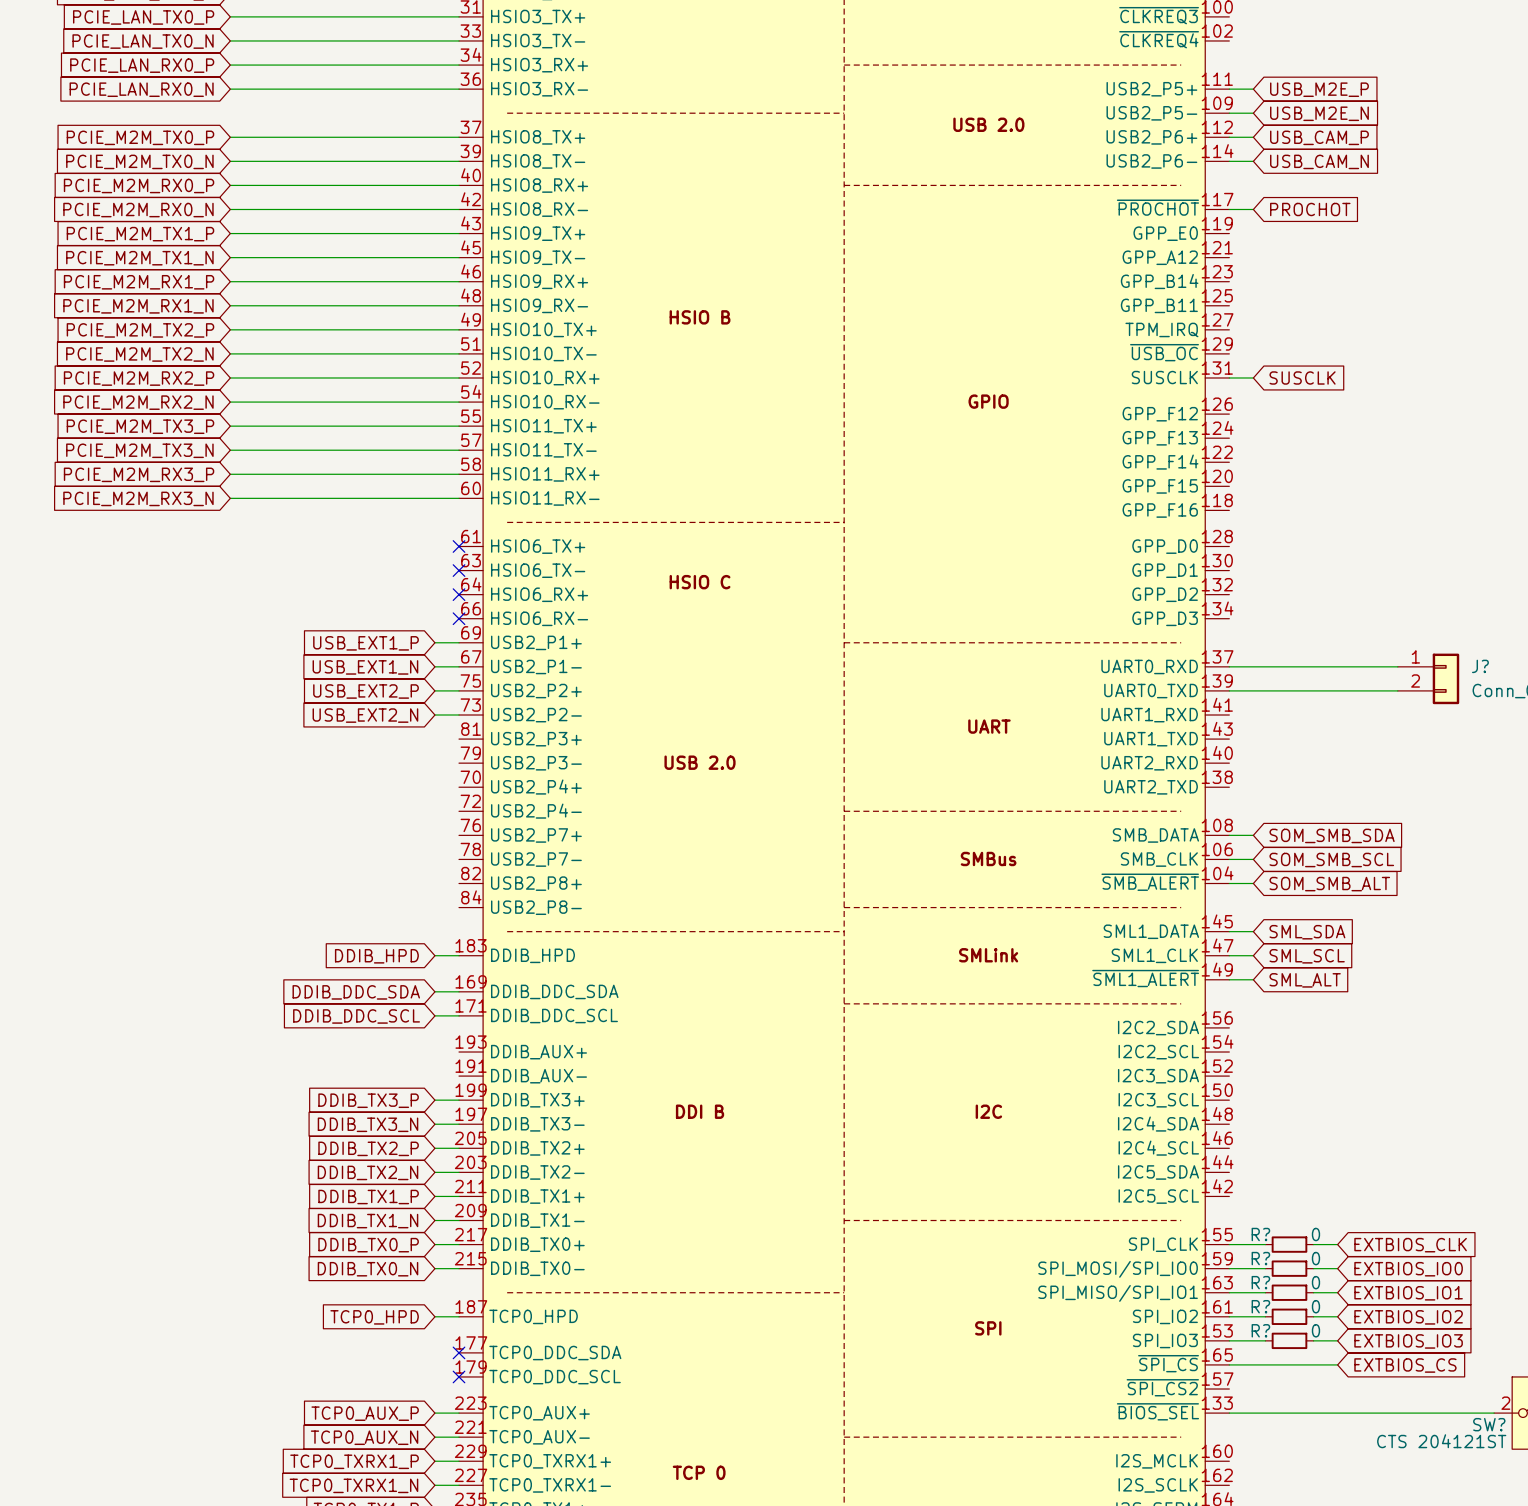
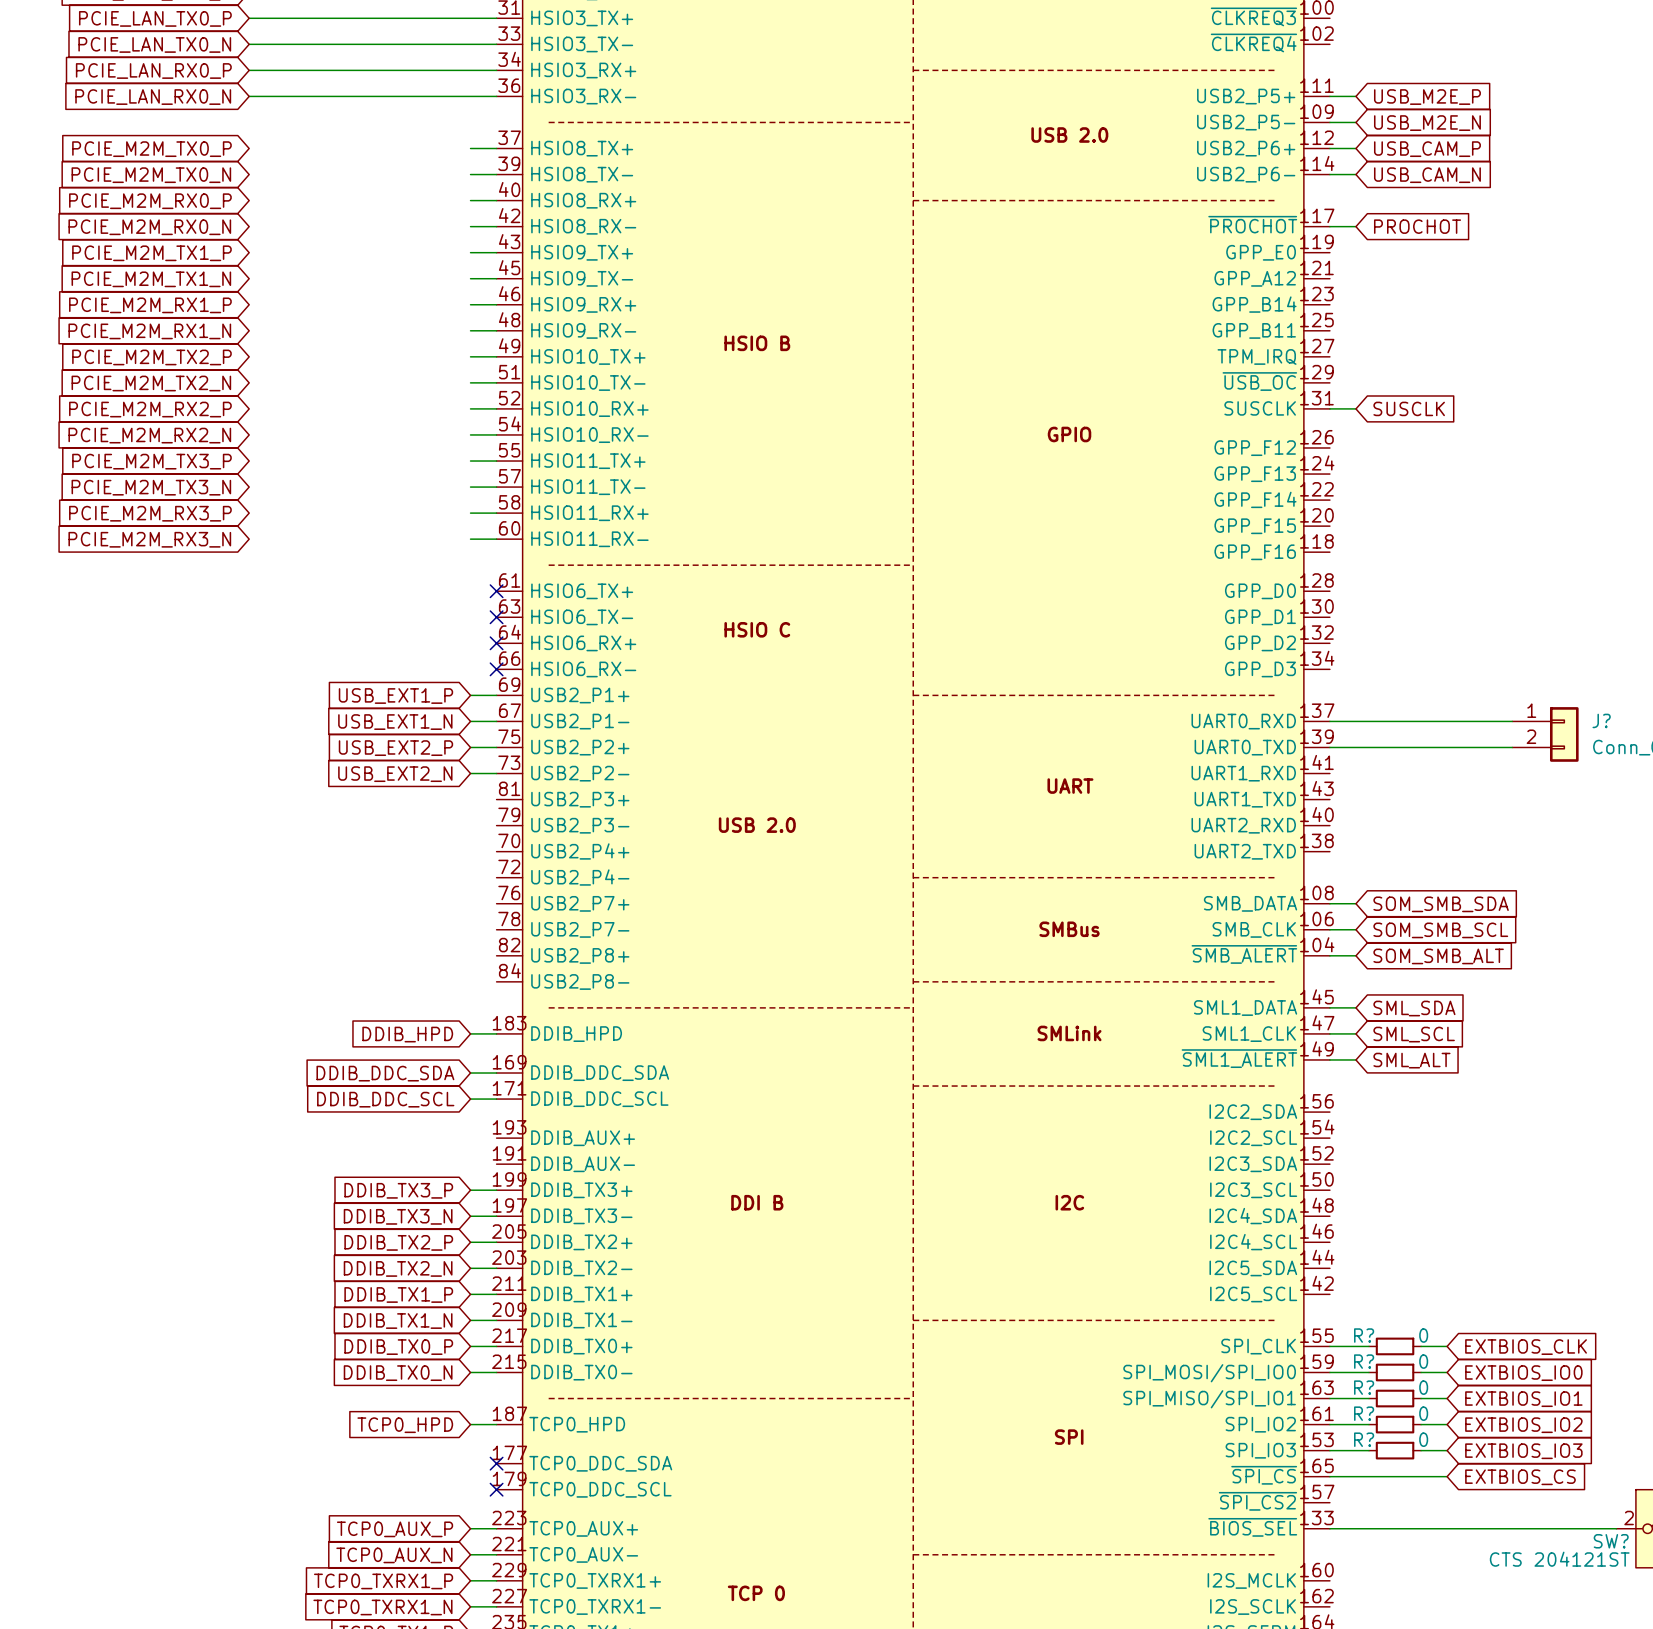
wire: (230, 137) (434, 137) -> none
wire: (230, 161) (434, 161) -> none
wire: (230, 185) (434, 185) -> none
wire: (230, 209) (434, 209) -> none
wire: (230, 233) (434, 233) -> none
wire: (230, 257) (434, 257) -> none
wire: (230, 281) (434, 281) -> none
wire: (230, 305) (434, 305) -> none
wire: (230, 329) (434, 329) -> none
wire: (230, 353) (434, 353) -> none
wire: (230, 377) (434, 377) -> none
wire: (230, 402) (434, 402) -> none
wire: (230, 426) (434, 426) -> none
wire: (230, 450) (434, 450) -> none
wire: (230, 474) (434, 474) -> none
wire: (230, 498) (434, 498) -> none

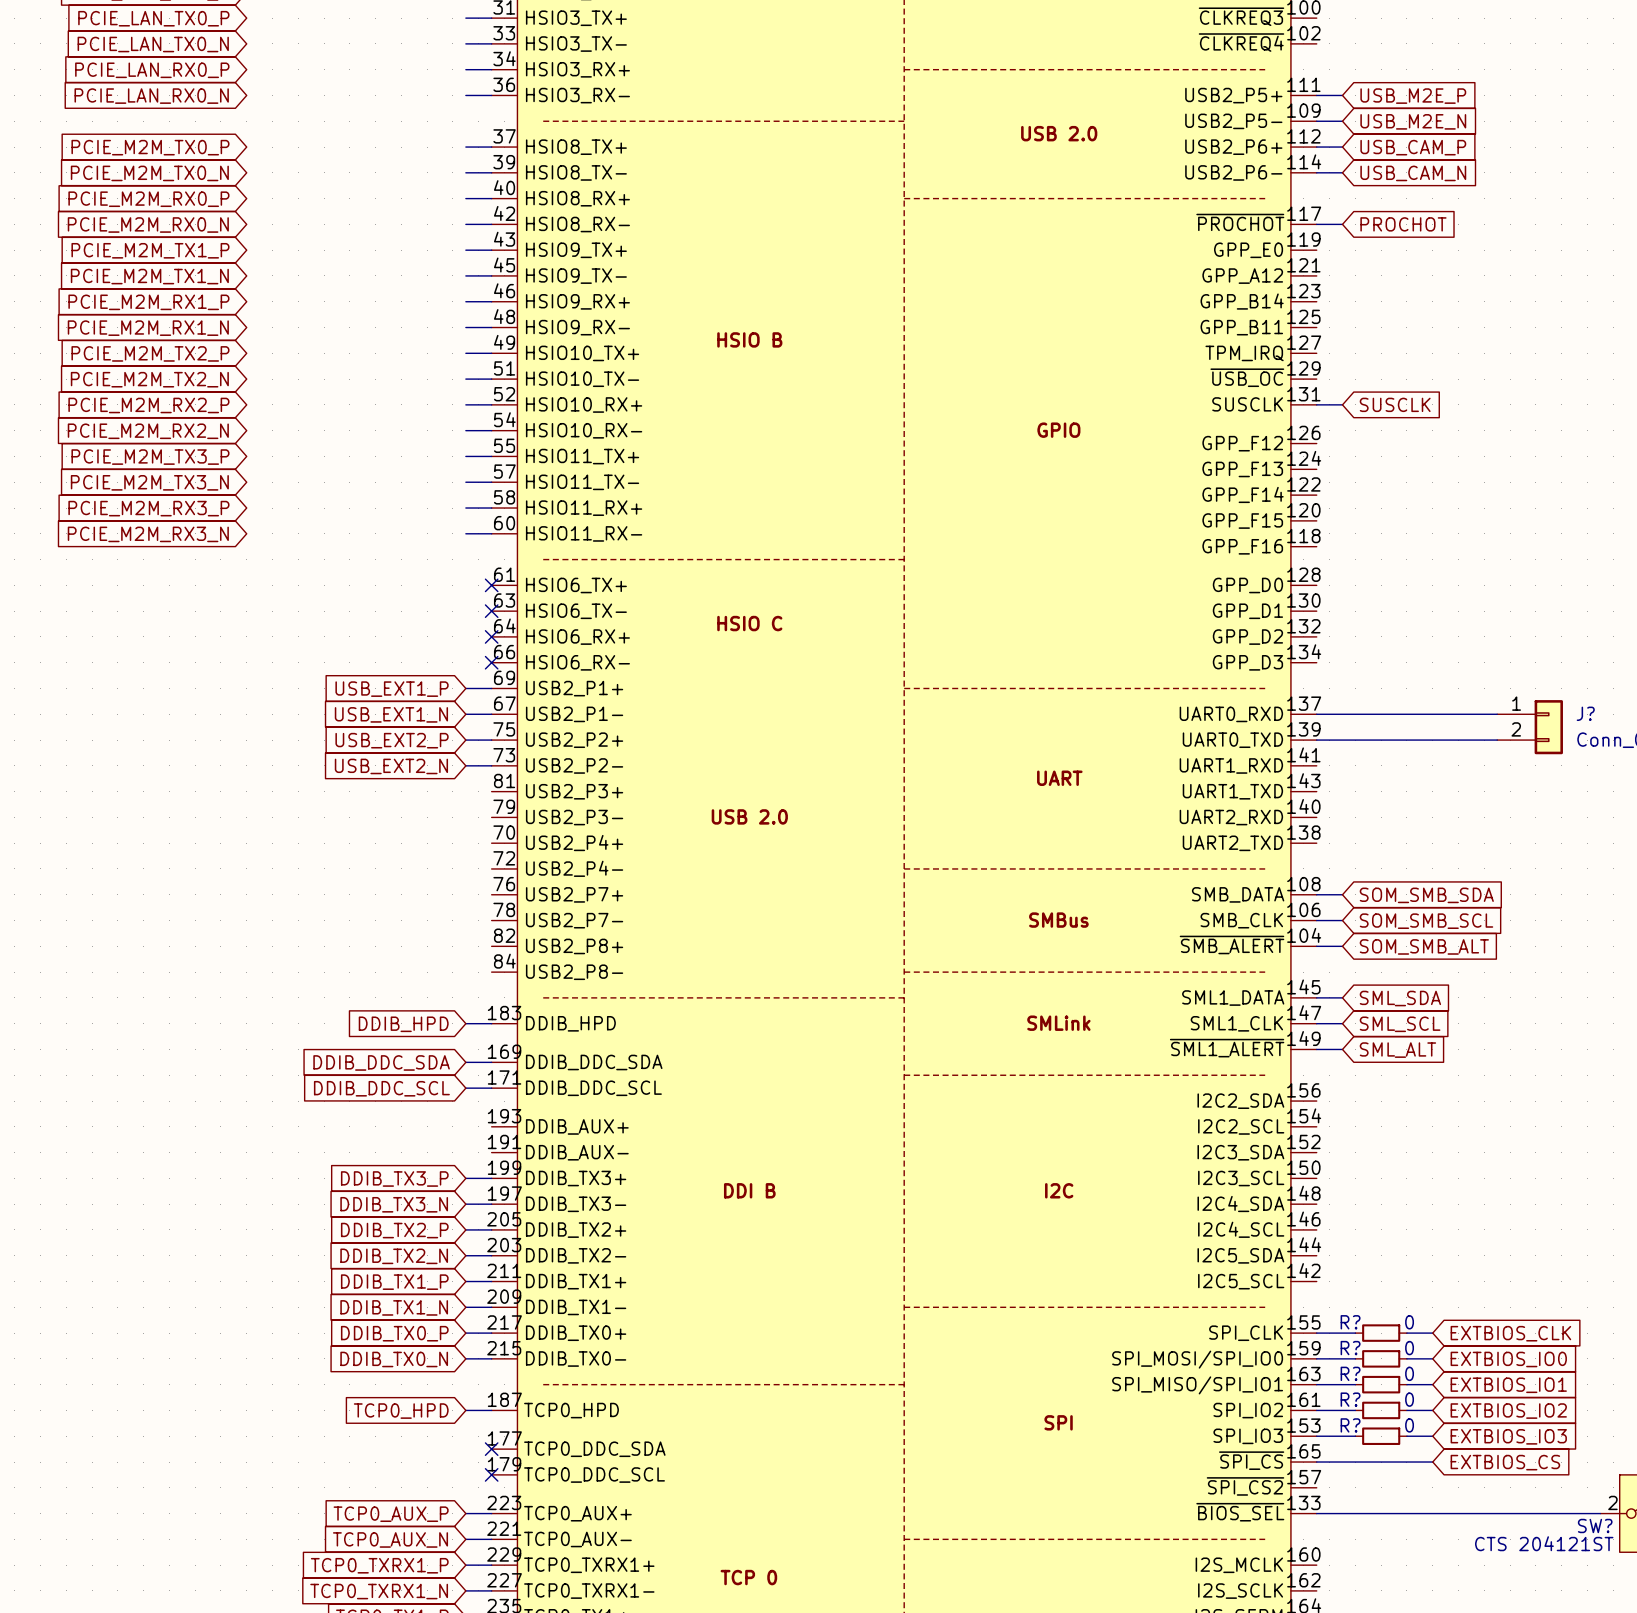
wire: (249, 18) (470, 18) -> none
wire: (249, 44) (470, 44) -> none
wire: (249, 70) (470, 70) -> none
wire: (249, 96) (470, 96) -> none

